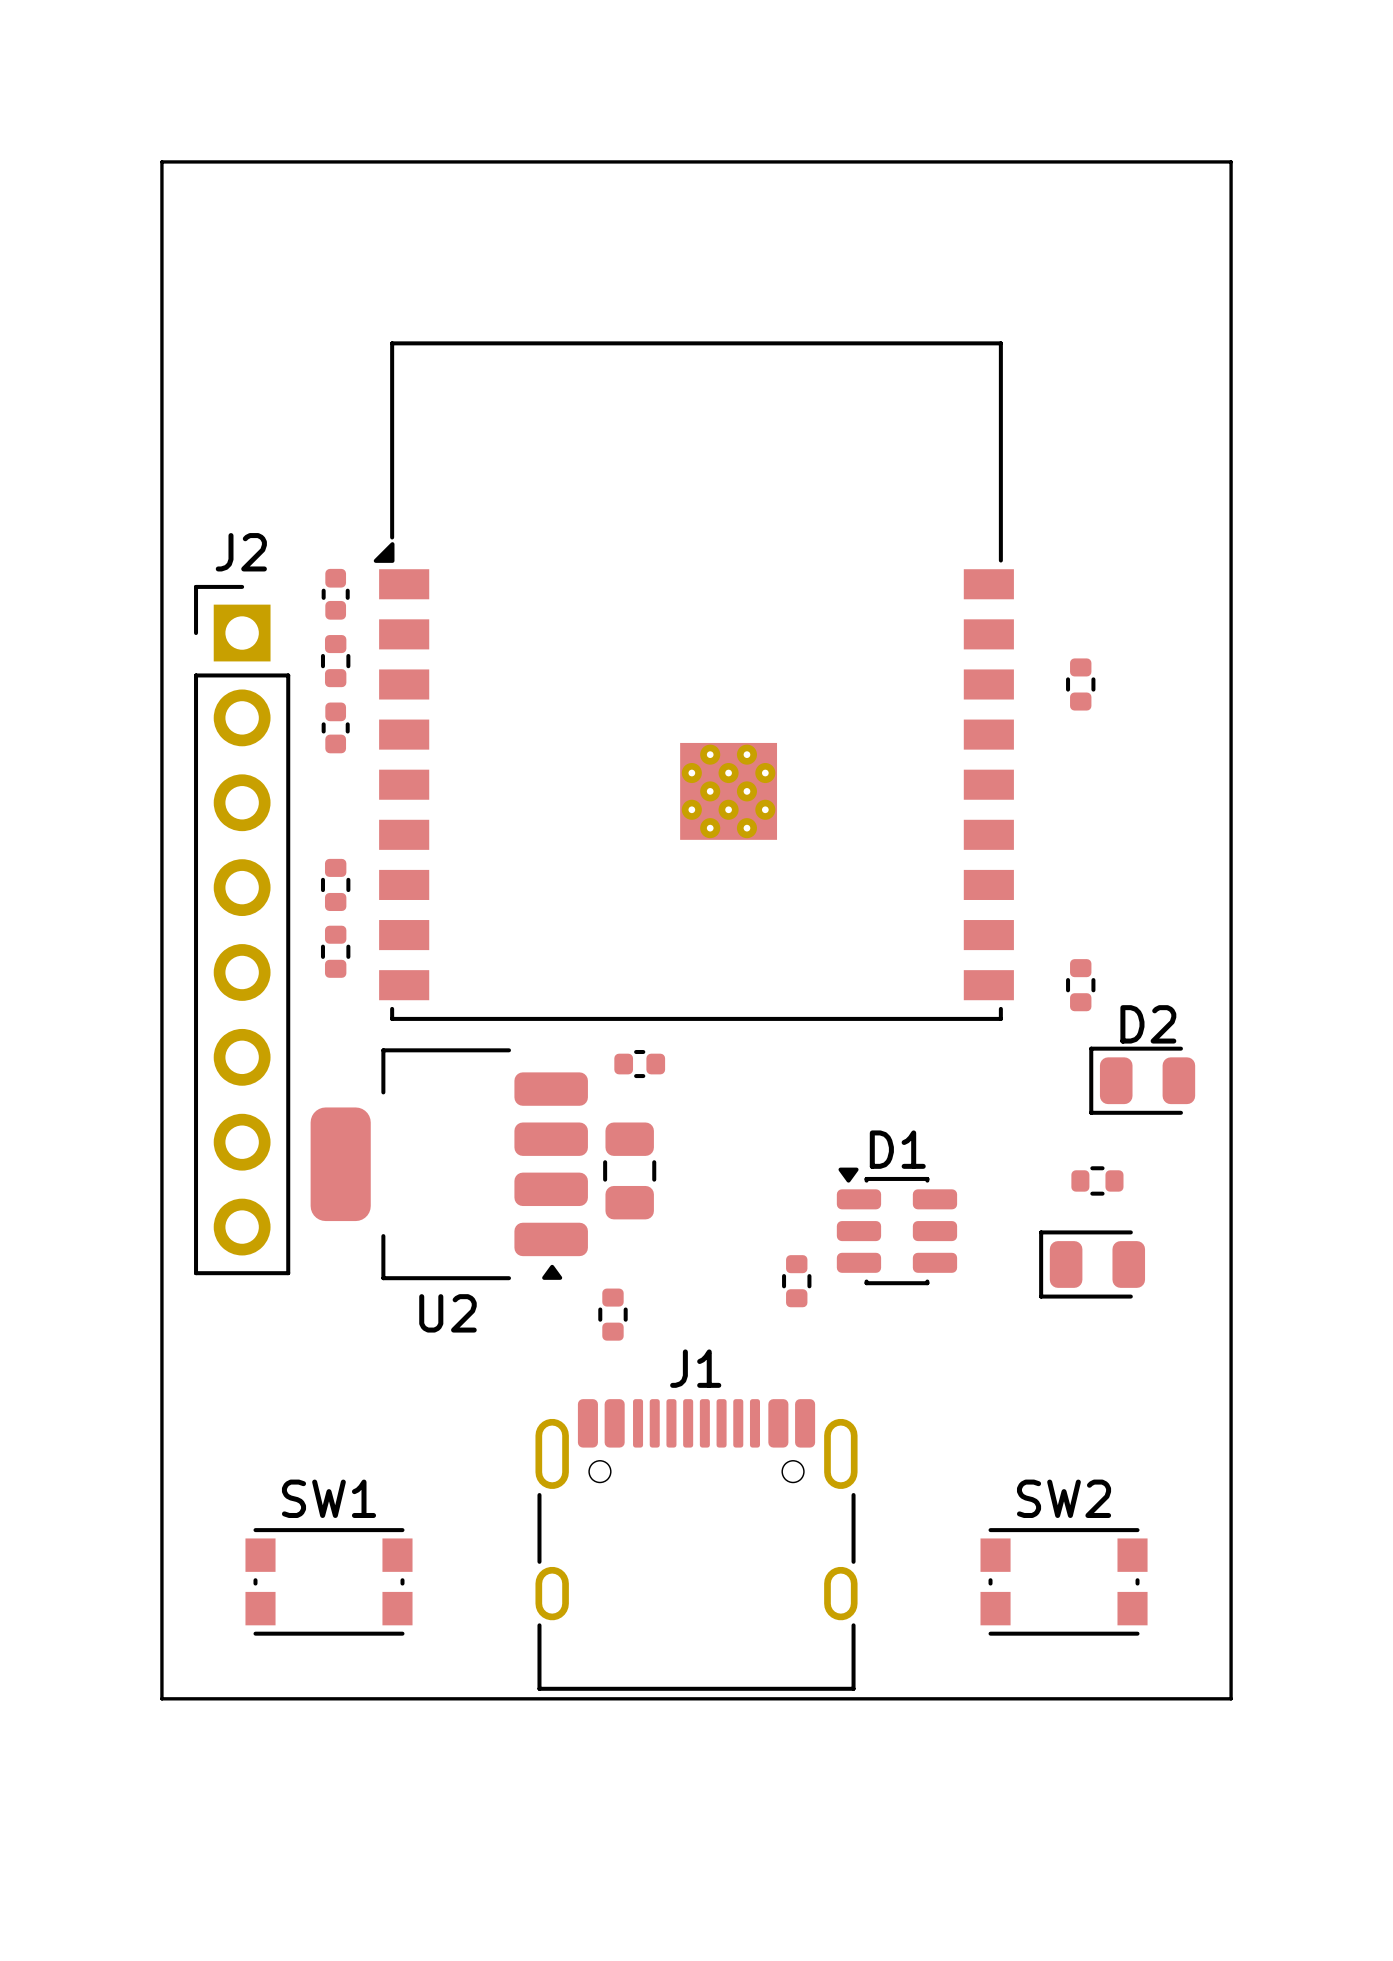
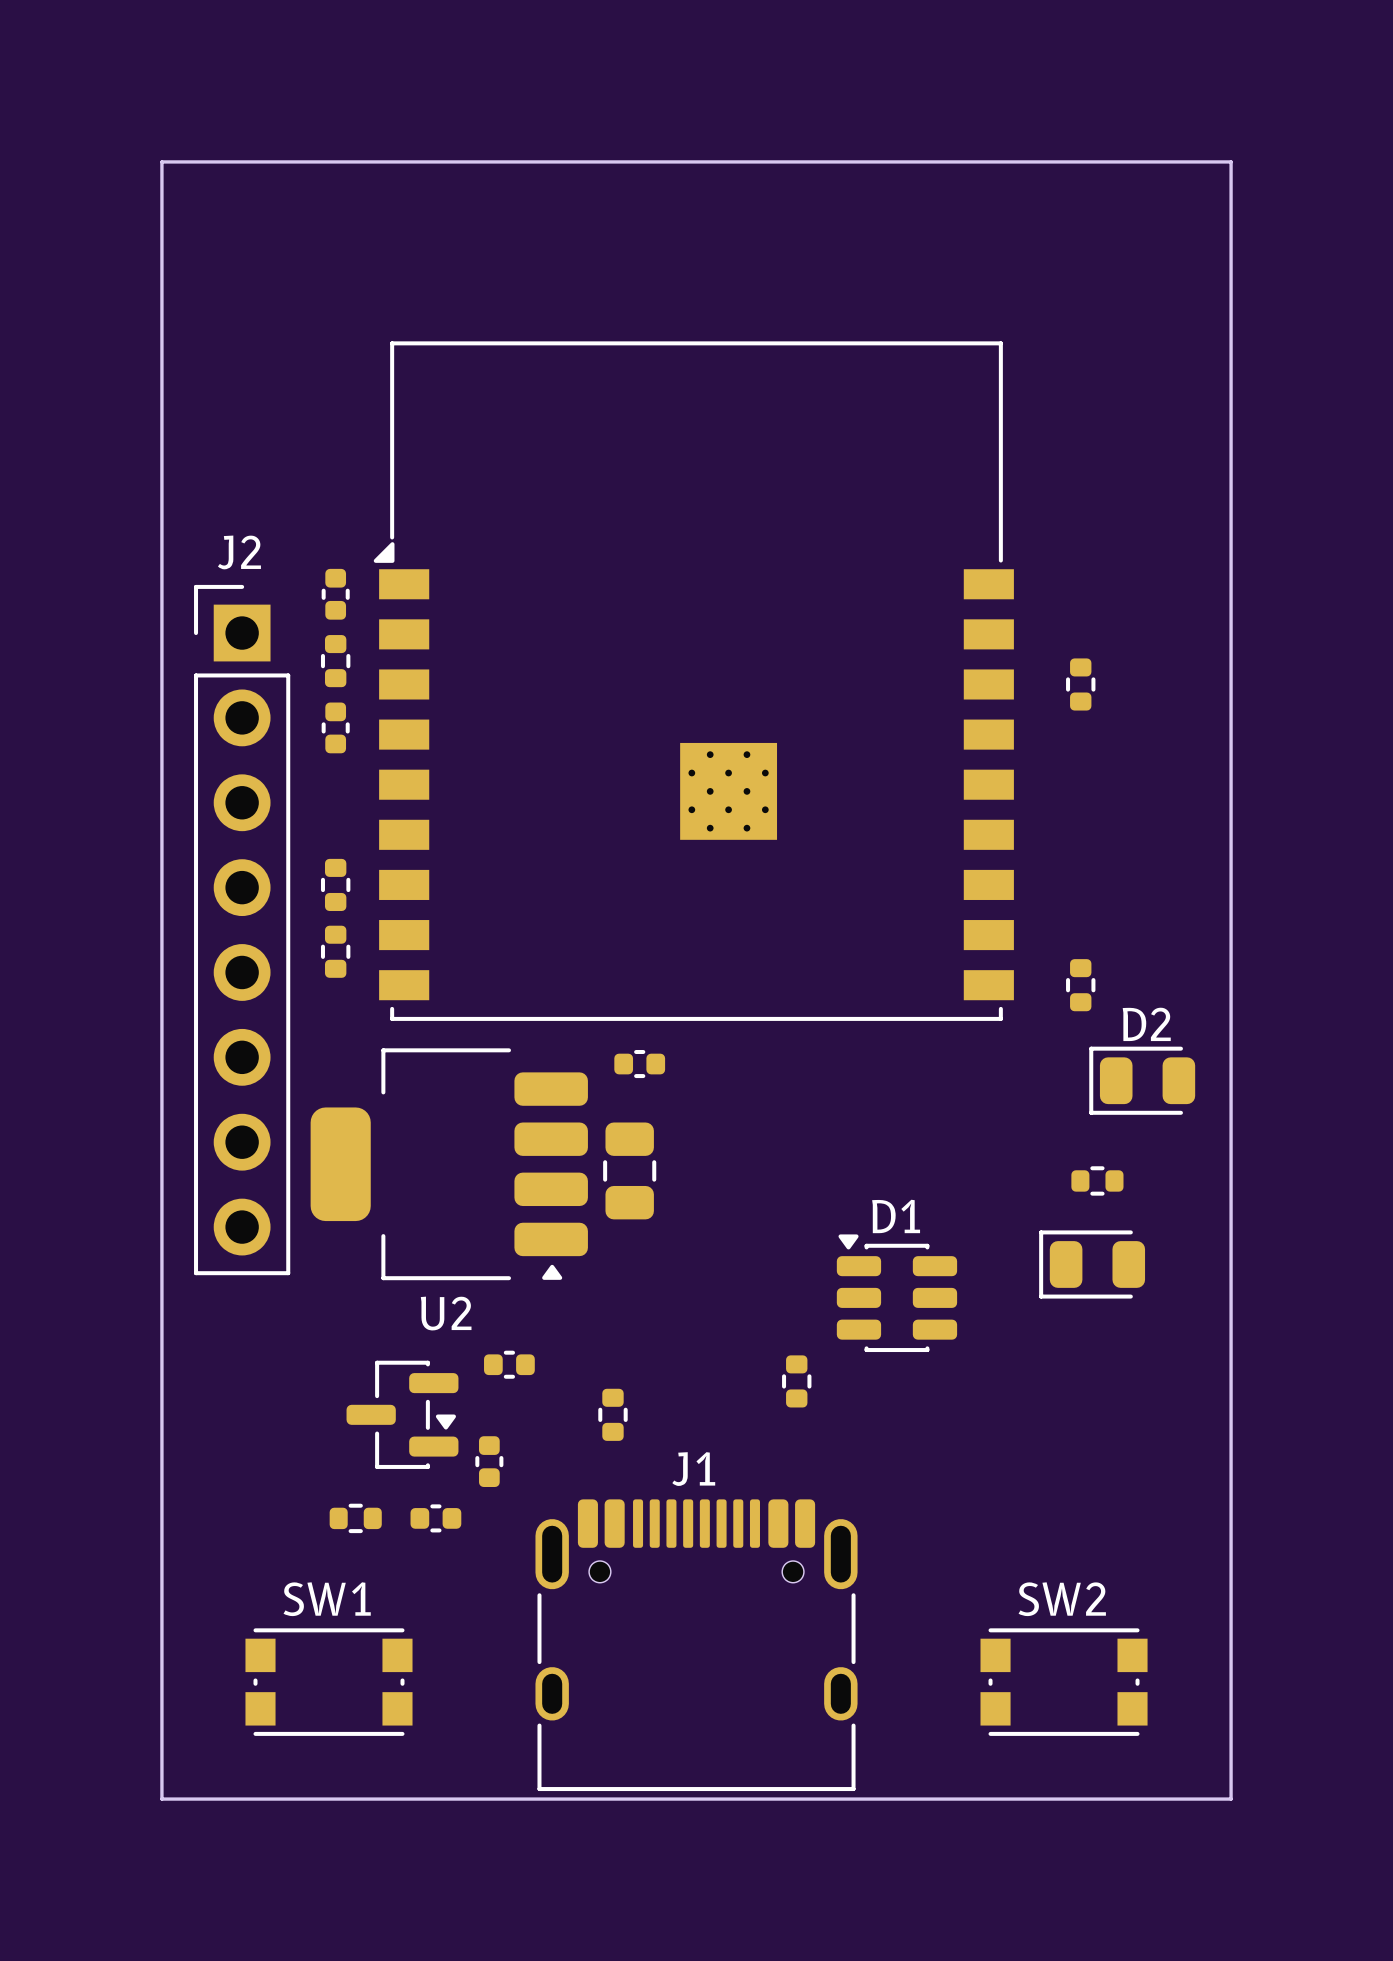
D1 position: (896, 1226) -> (896, 1293)
part: (796, 1281) -> none
part: (612, 1314) -> none
part: none -> (509, 1364)
part: none -> (796, 1381)
part: none -> (402, 1414)
part: none -> (612, 1414)
part: none -> (489, 1461)
part: none -> (355, 1518)
part: none -> (435, 1518)
J1 position: (696, 1544) -> (696, 1645)
SW1 position: (328, 1581) -> (328, 1682)
SW2 position: (1064, 1581) -> (1064, 1682)
board edge: (161, 1698) (1231, 1698) -> (161, 1698) (161, 1799) (1231, 1799) (1231, 1698)

